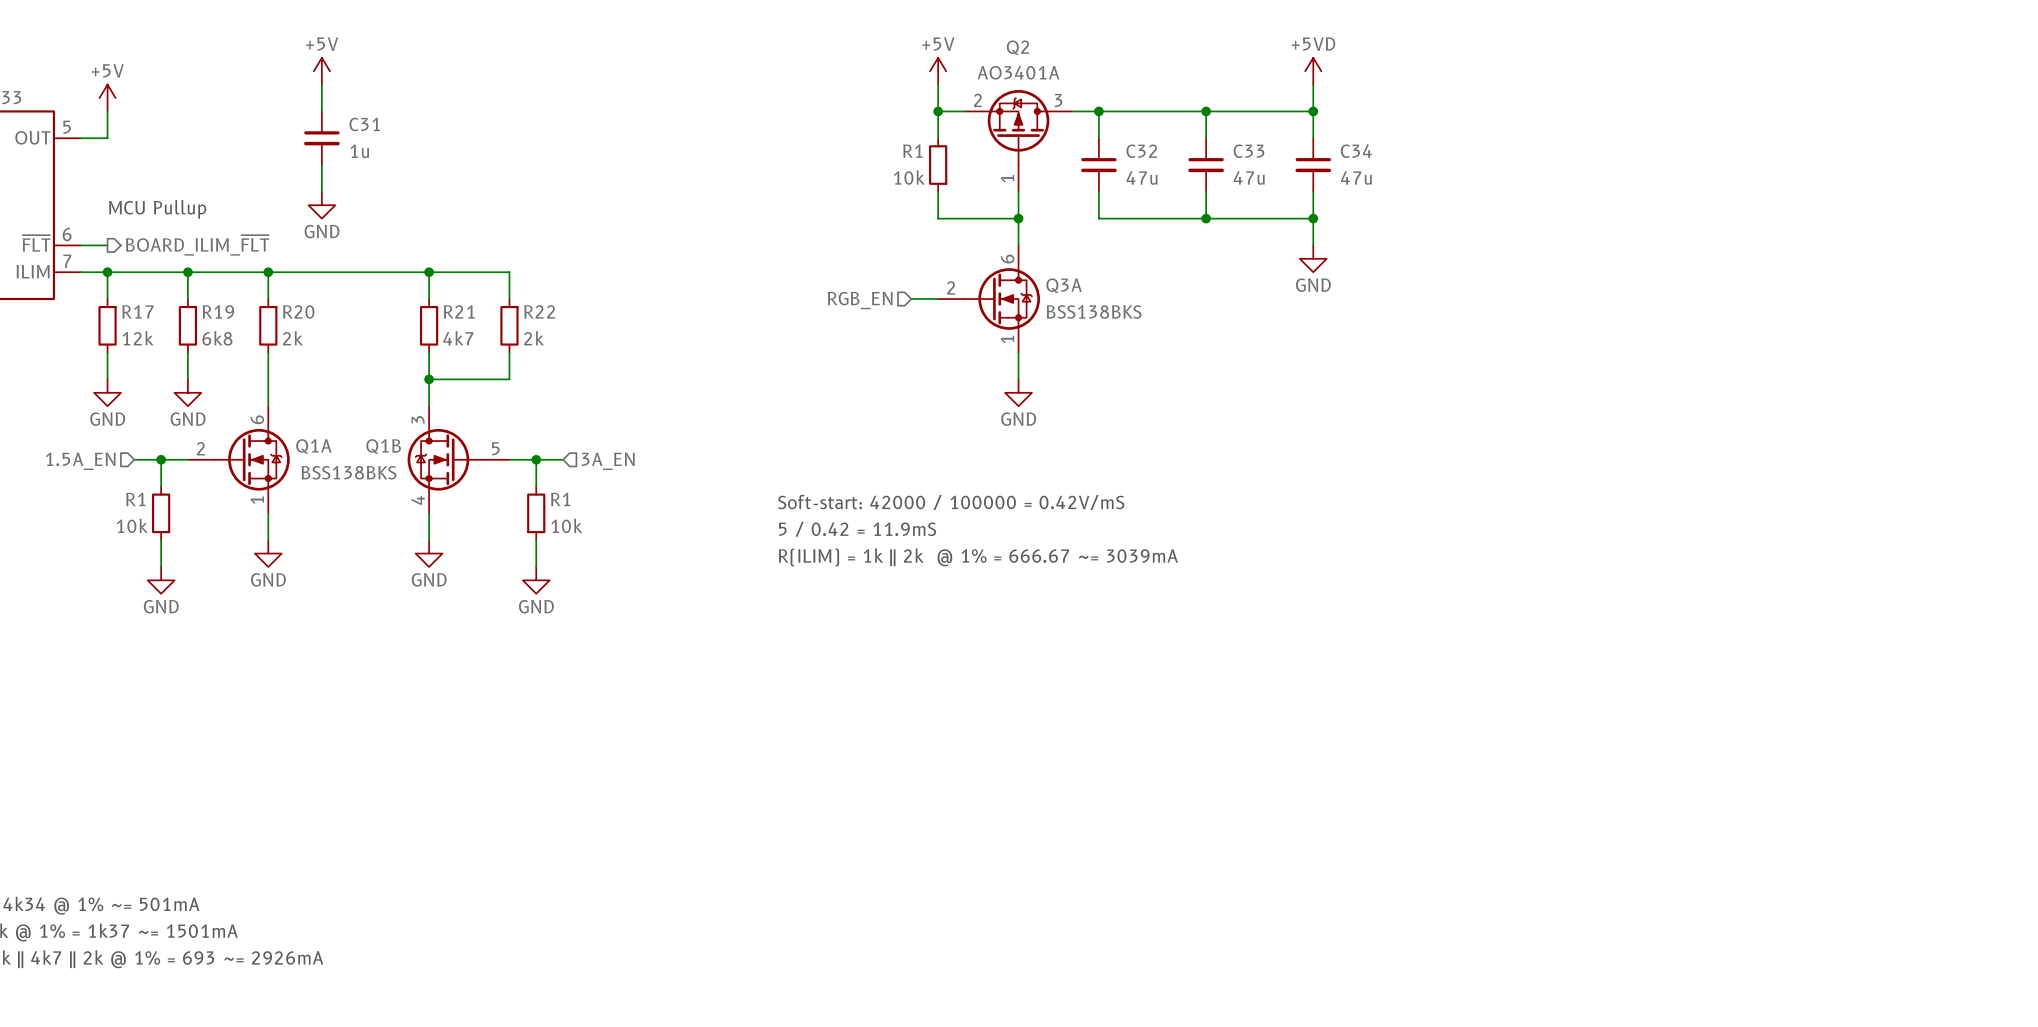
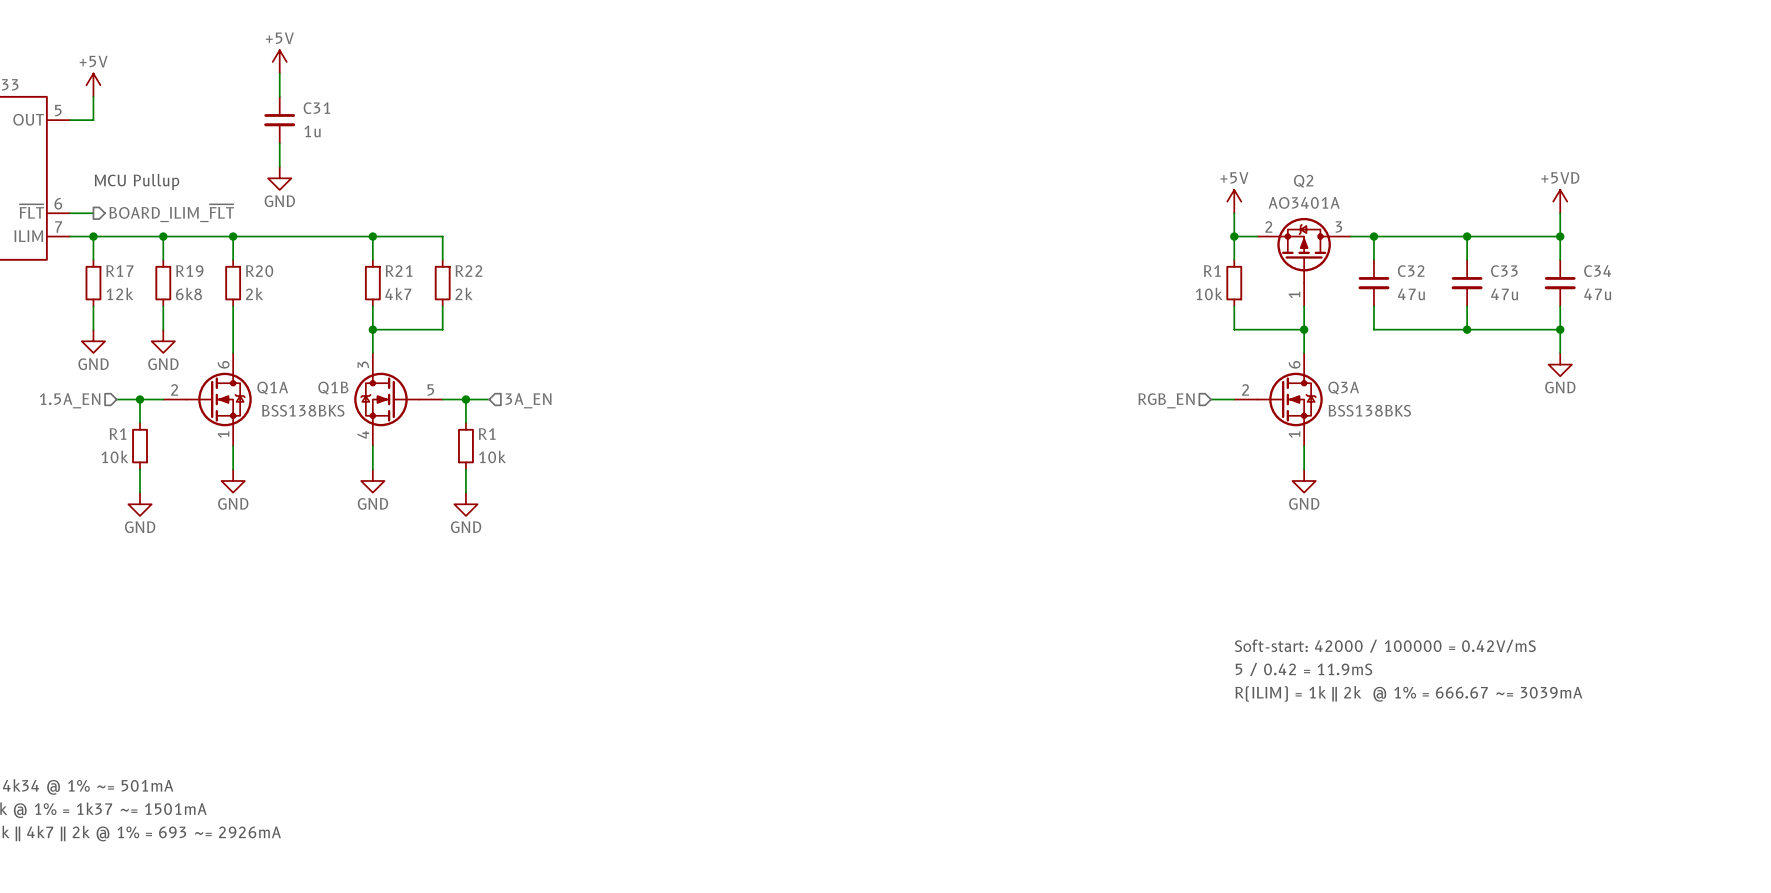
power symbol: +5V (938, 71) -> none
power symbol: +5VD (1313, 71) -> none
wire: (938, 84) (938, 138) -> none
wire: (1313, 84) (1313, 138) -> none
wire: (938, 111) (964, 111) -> none
junction: (938, 111) -> none
wire: (1072, 111) (1313, 111) -> none
wire: (1098, 111) (1098, 138) -> none
junction: (1098, 111) -> none
wire: (1206, 111) (1206, 138) -> none
junction: (1206, 111) -> none
junction: (1313, 111) -> none
Q2 position: (1018, 140) -> (1304, 262)
R1: 10k (938, 165) -> none
C32 position: (1098, 165) -> (1373, 283)
C33 position: (1206, 165) -> (1467, 283)
C34 position: (1313, 165) -> (1560, 283)
wire: (938, 191) (938, 218) (1018, 218) -> none
wire: (1018, 191) (1018, 245) -> none
wire: (1098, 191) (1098, 218) (1313, 218) -> none
wire: (1206, 191) (1206, 218) -> none
wire: (1313, 191) (1313, 245) -> (1234, 213) (1234, 259)
junction: (1018, 218) -> none
junction: (1206, 218) -> none
junction: (1313, 218) -> none
power symbol: none -> +5V (1234, 201)
power symbol: none -> +5VD (1560, 201)
wire: none -> (1560, 213) (1560, 259)
power symbol: GND (1313, 258) -> none
wire: none -> (1234, 236) (1257, 236)
junction: none -> (1234, 236)
wire: none -> (1350, 236) (1560, 236)
wire: none -> (1373, 236) (1373, 259)
junction: none -> (1373, 236)
wire: none -> (1467, 236) (1467, 259)
junction: none -> (1467, 236)
junction: none -> (1560, 236)
wire: (911, 299) (938, 299) -> none
Q3A position: (989, 299) -> (1278, 399)
hierarchical label: RGB_EN (860, 300) -> none
R1: none -> 10k (1234, 283)
wire: (1018, 352) (1018, 379) -> none
wire: none -> (1234, 306) (1234, 329) (1304, 329)
wire: none -> (1304, 306) (1304, 352)
wire: none -> (1373, 306) (1373, 329) (1560, 329)
wire: none -> (1467, 306) (1467, 329)
wire: none -> (1560, 306) (1560, 352)
junction: none -> (1304, 329)
junction: none -> (1467, 329)
junction: none -> (1560, 329)
power symbol: GND (1018, 392) -> none
power symbol: none -> GND (1560, 364)
wire: none -> (1211, 399) (1234, 399)
hierarchical label: none -> RGB_EN (1166, 400)
text: Soft-start: 42000 / 100000 = 0.42V/mS (951, 502) -> none
wire: none -> (1304, 446) (1304, 469)
text: 5 / 0.42 = 11.9mS (857, 529) -> none
power symbol: none -> GND (1304, 481)
text: R(ILIM) = 1k || 2k @ 1% = 666.67 ~= 3039mA (978, 557) -> none
text: none -> Soft-start: 42000 / 100000 = 0.42V/mS (1385, 646)
text: none -> 5 / 0.42 = 11.9mS (1304, 669)
text: none -> R(ILIM) = 1k || 2k @ 1% = 666.67 ~= 3039mA (1408, 693)

